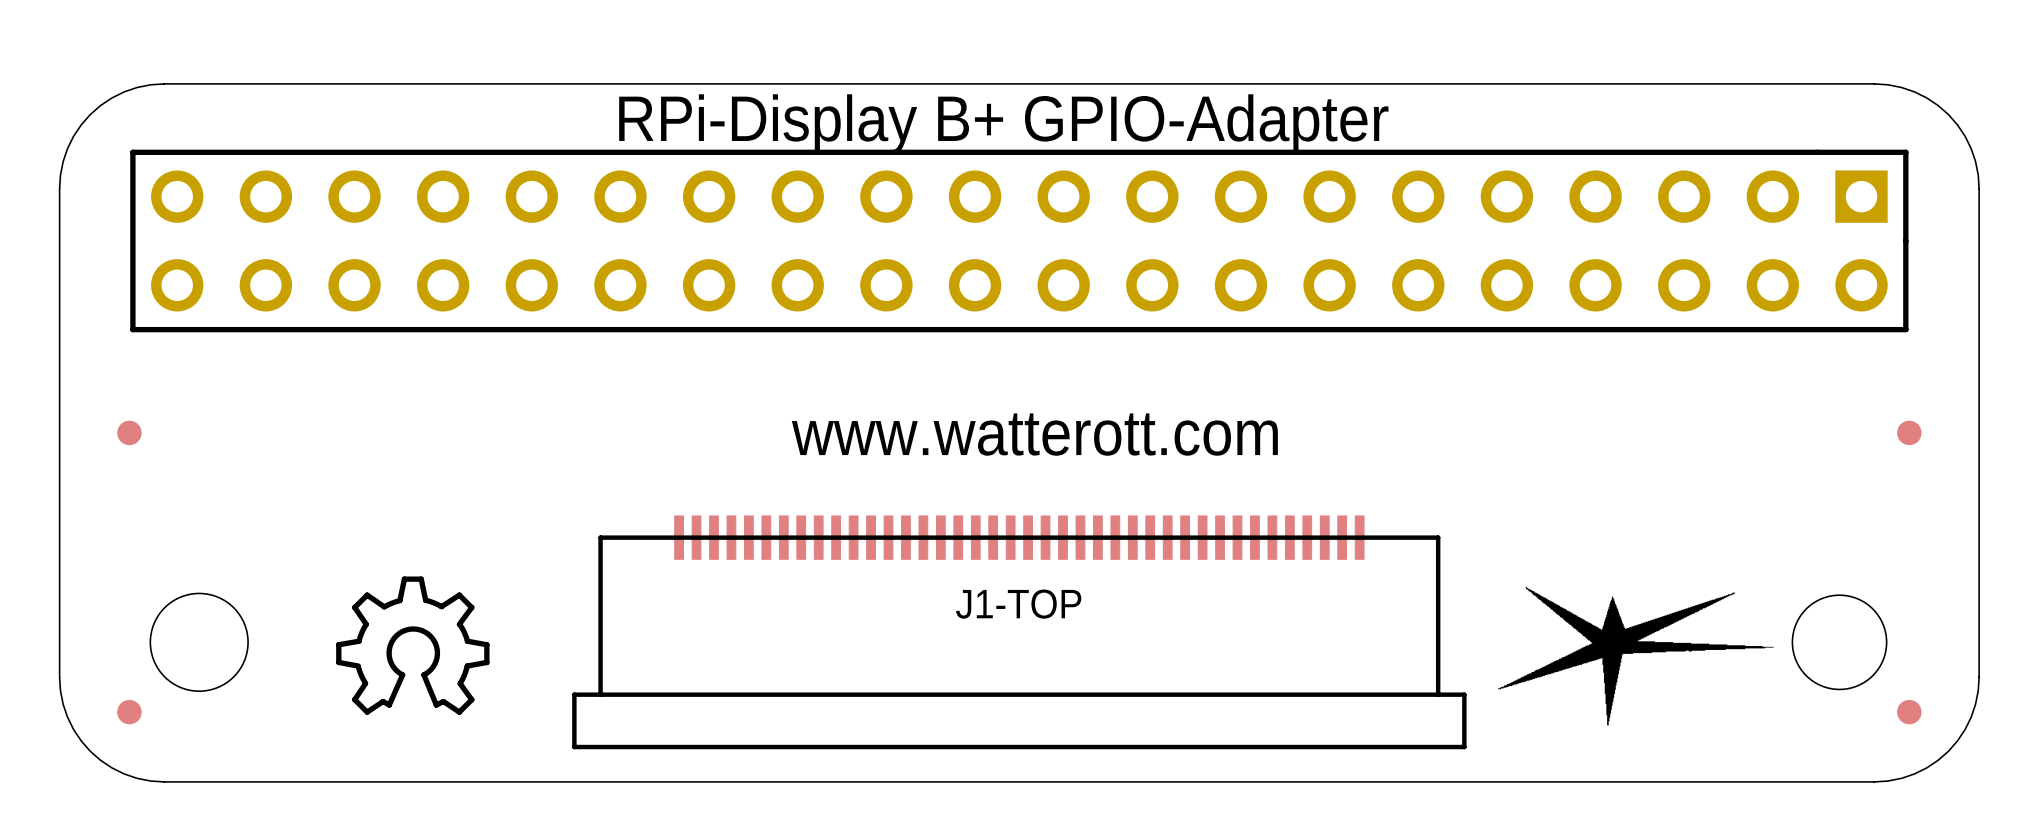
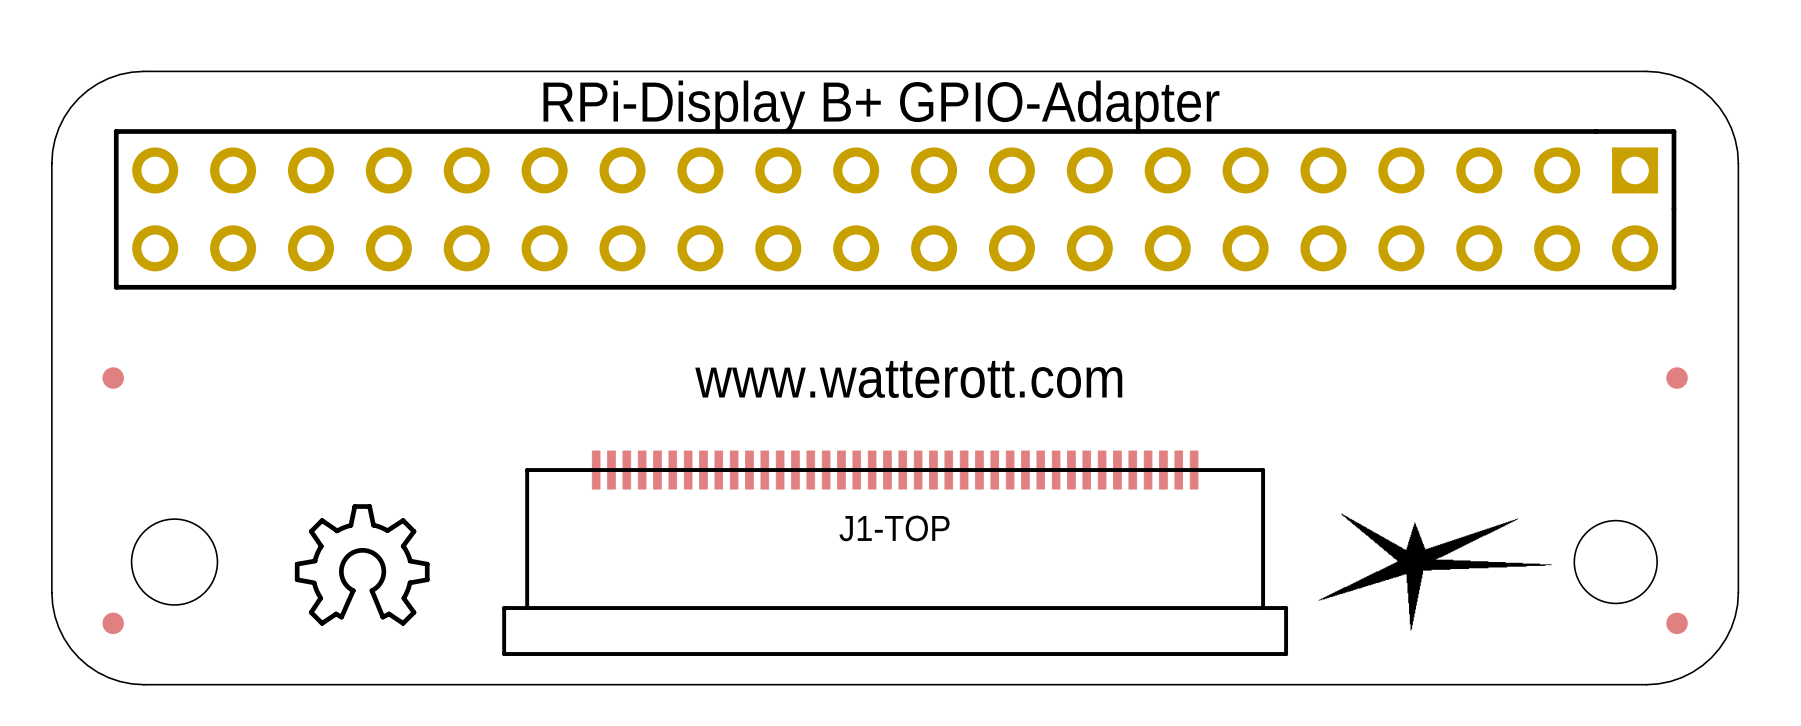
drawing shape: [1497, 587, 1774, 726] -> [1318, 513, 1552, 631]

